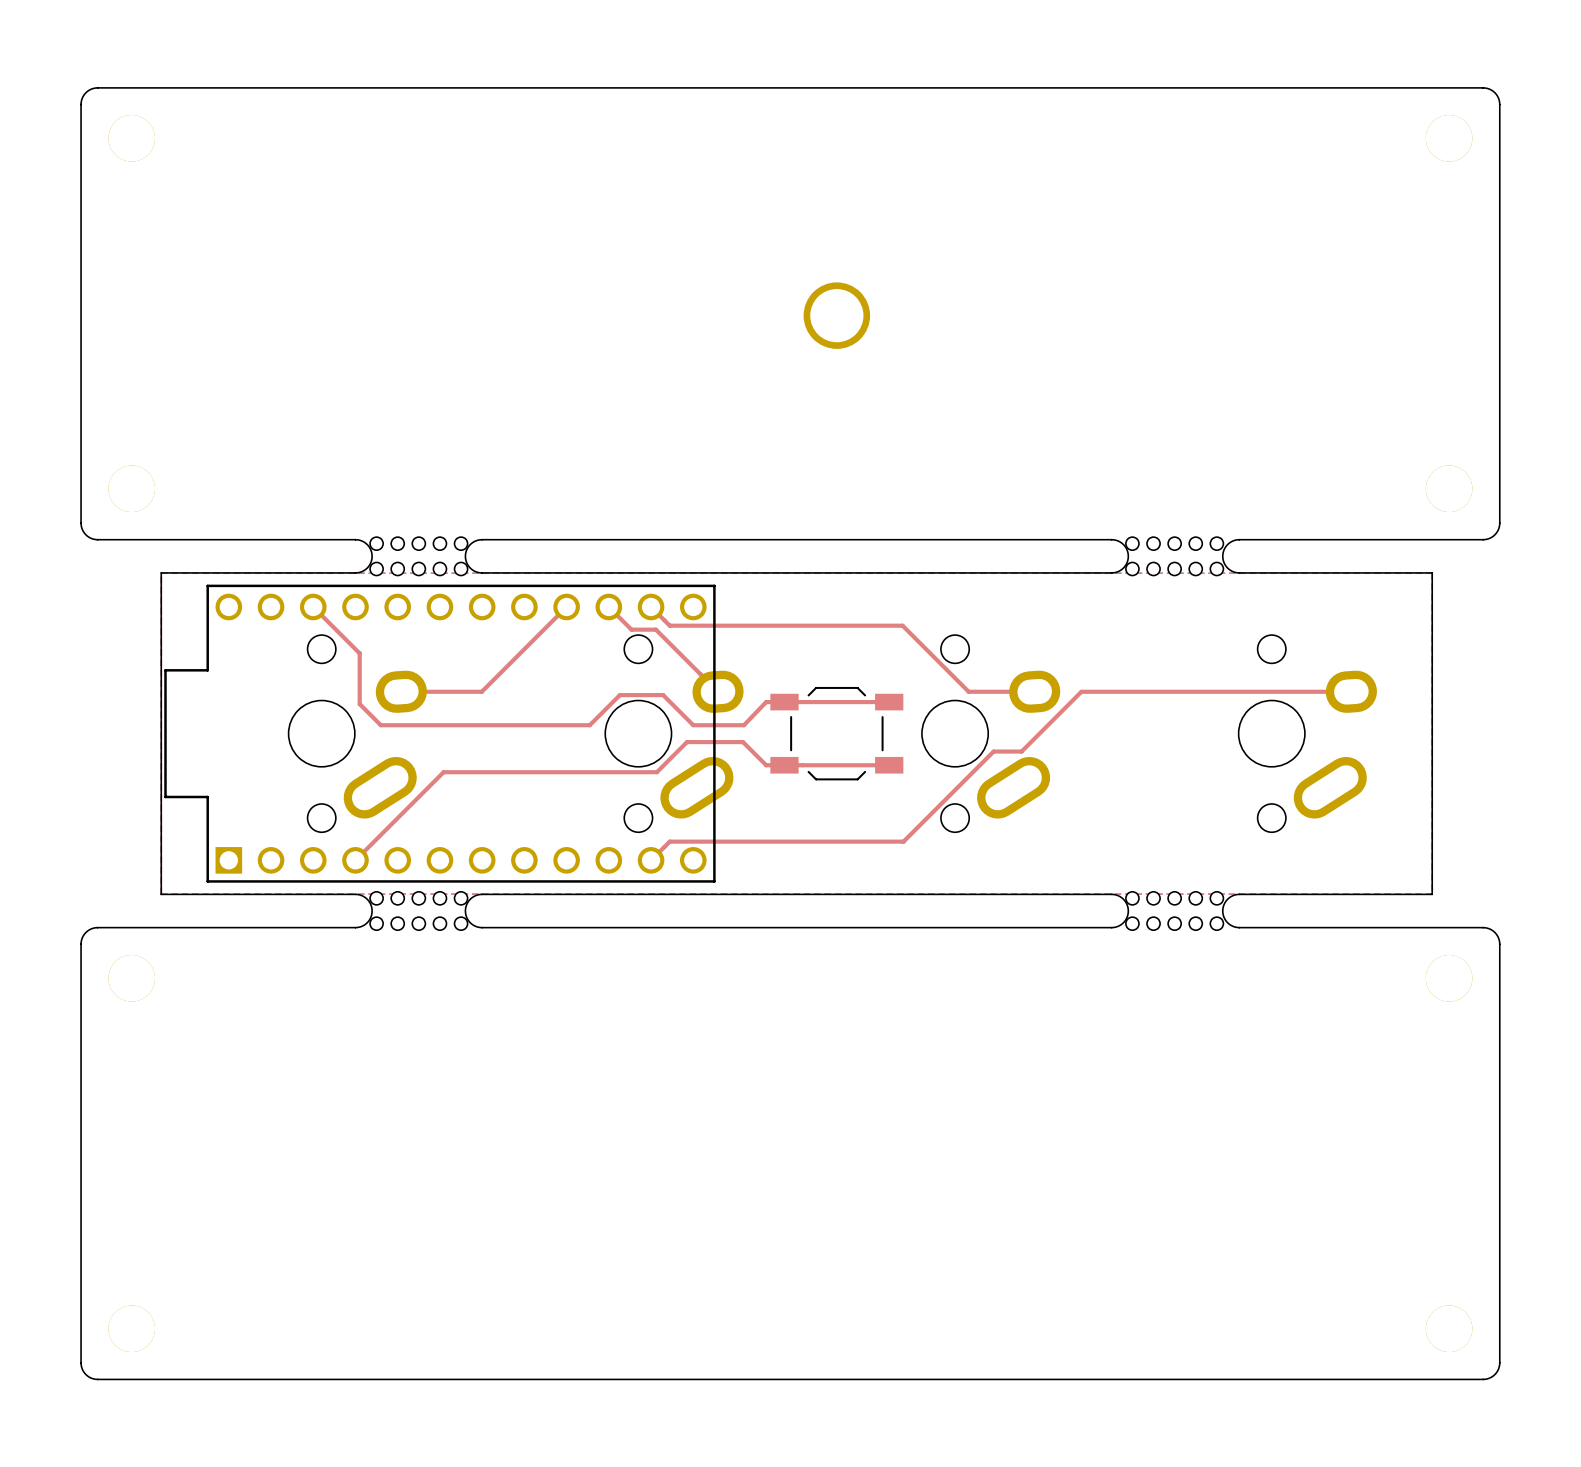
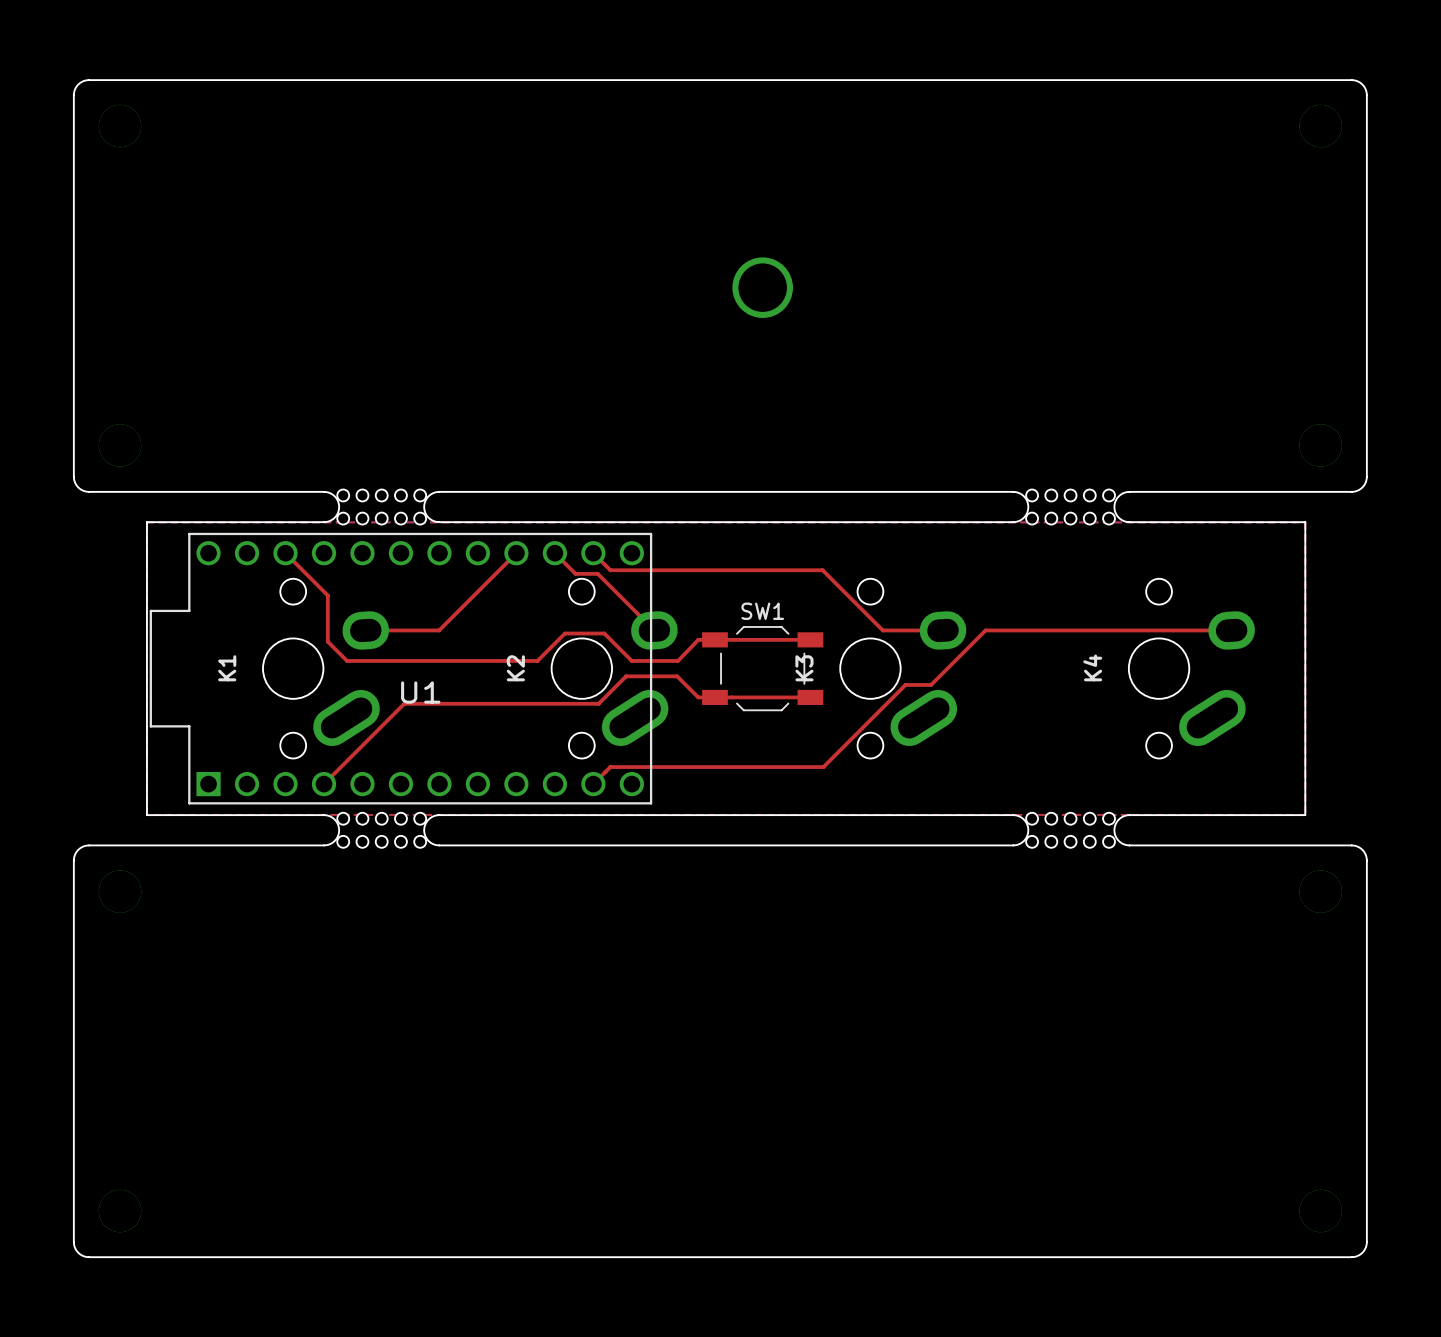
SW1 name: none -> SW1 (762, 611)
K4 name: none -> K4 (1092, 667)
K1 name: none -> K1 (227, 668)
K2 name: none -> K2 (515, 668)
K3 name: none -> K3 (804, 668)
U1 name: none -> U1 (420, 692)

